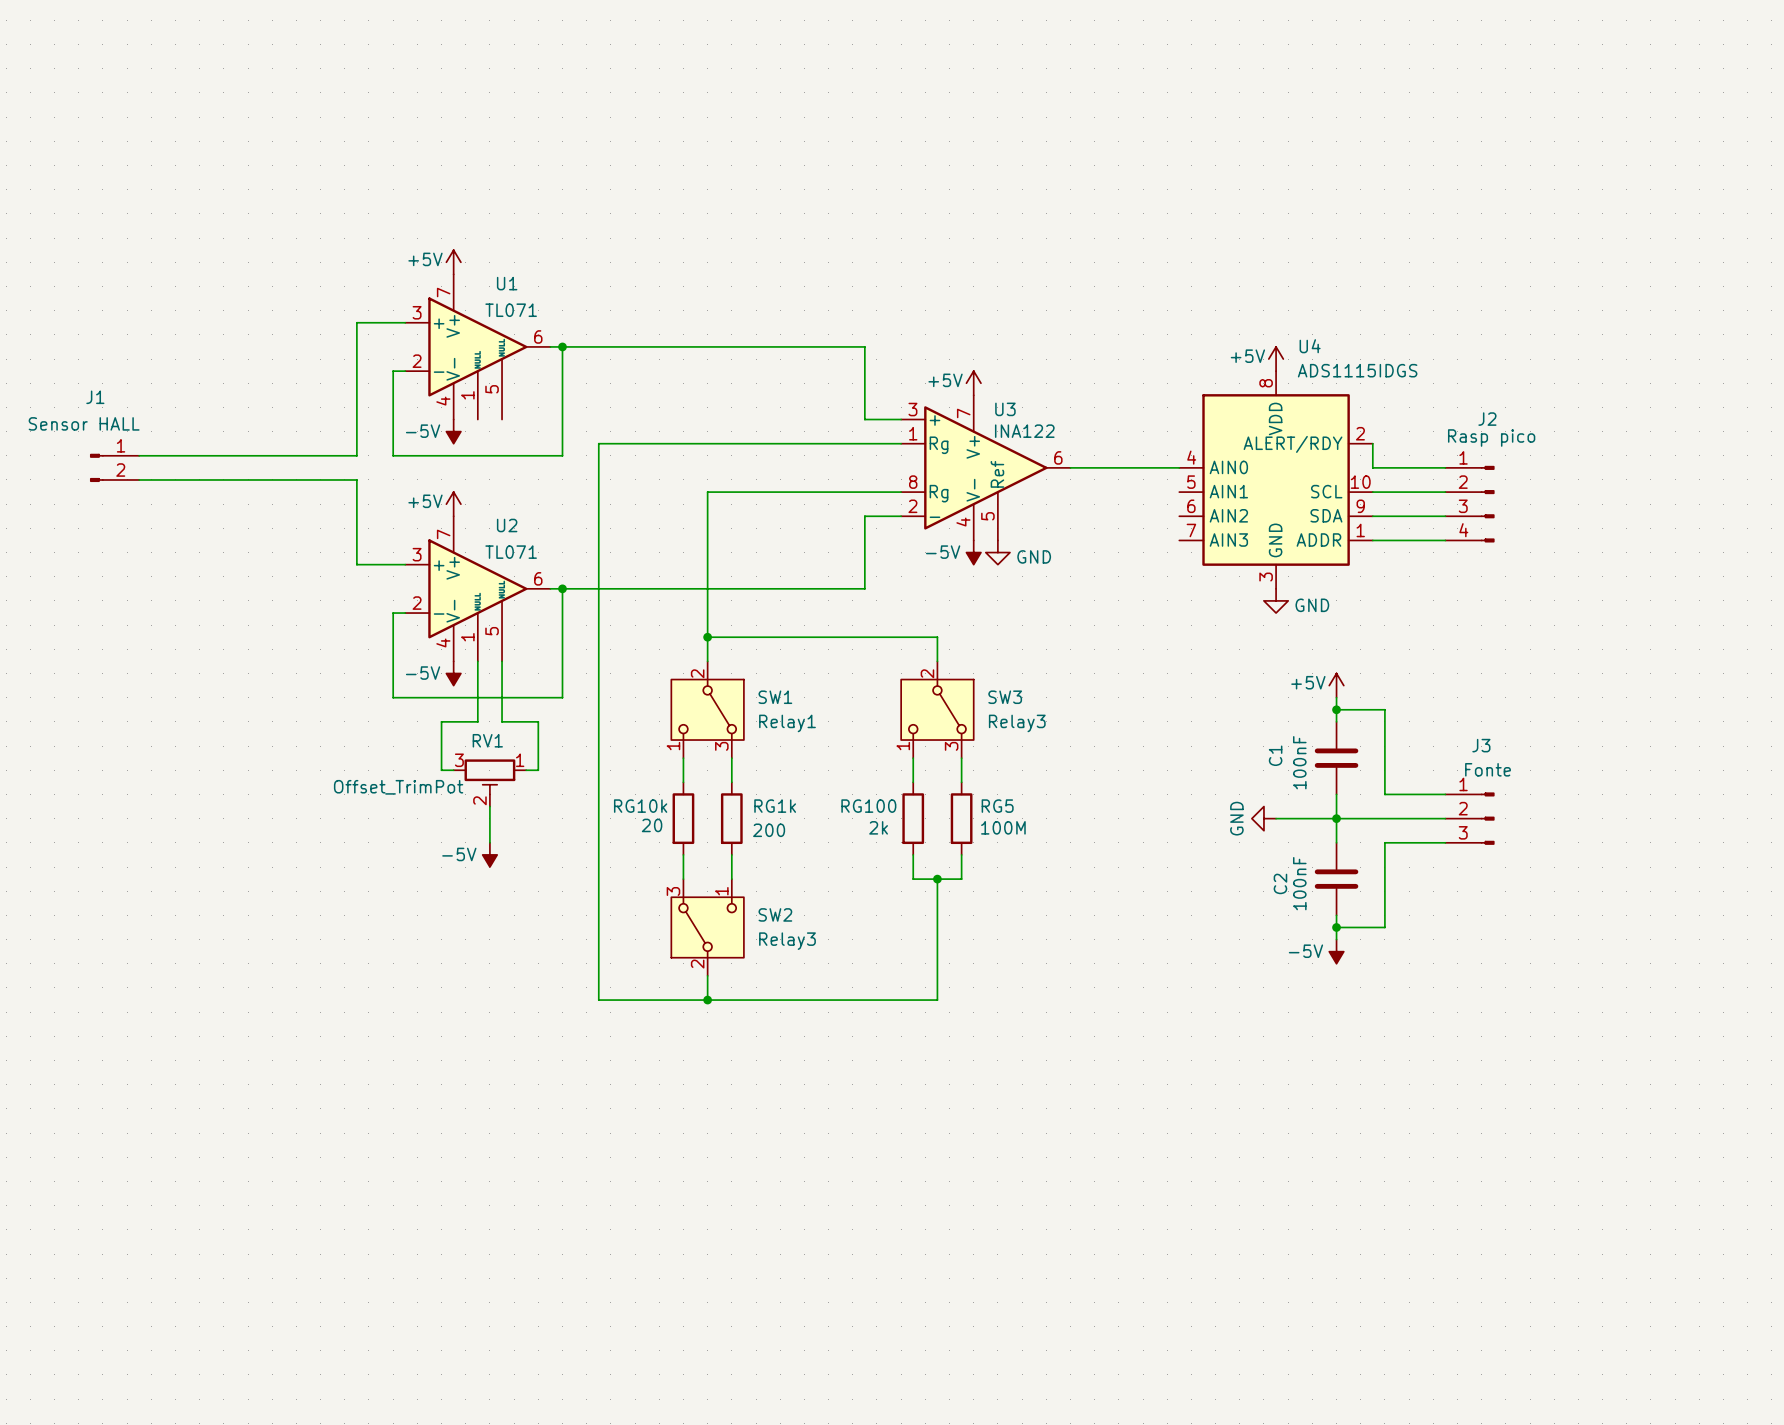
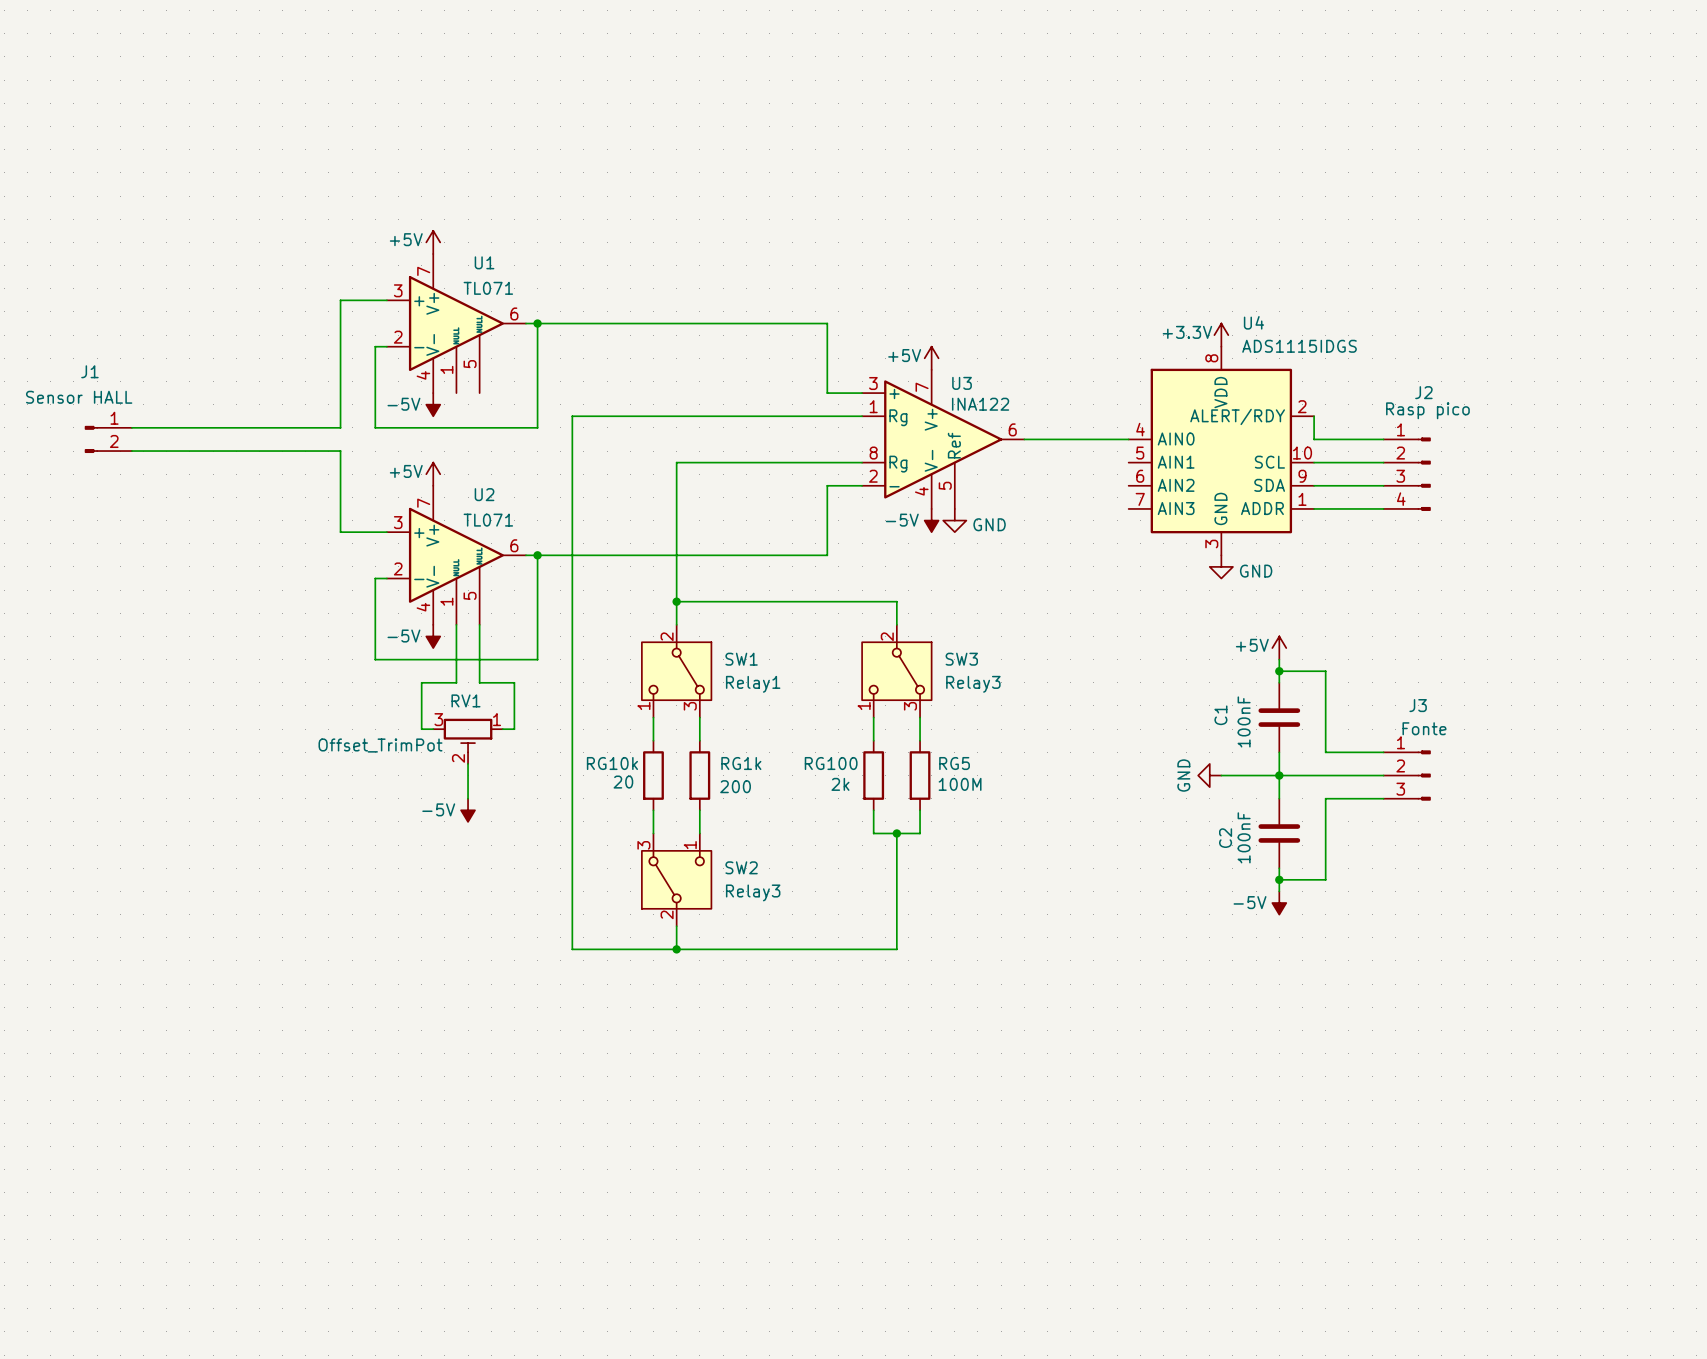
power symbol: +5V (1276, 359) -> +3.3V (1221, 335)

